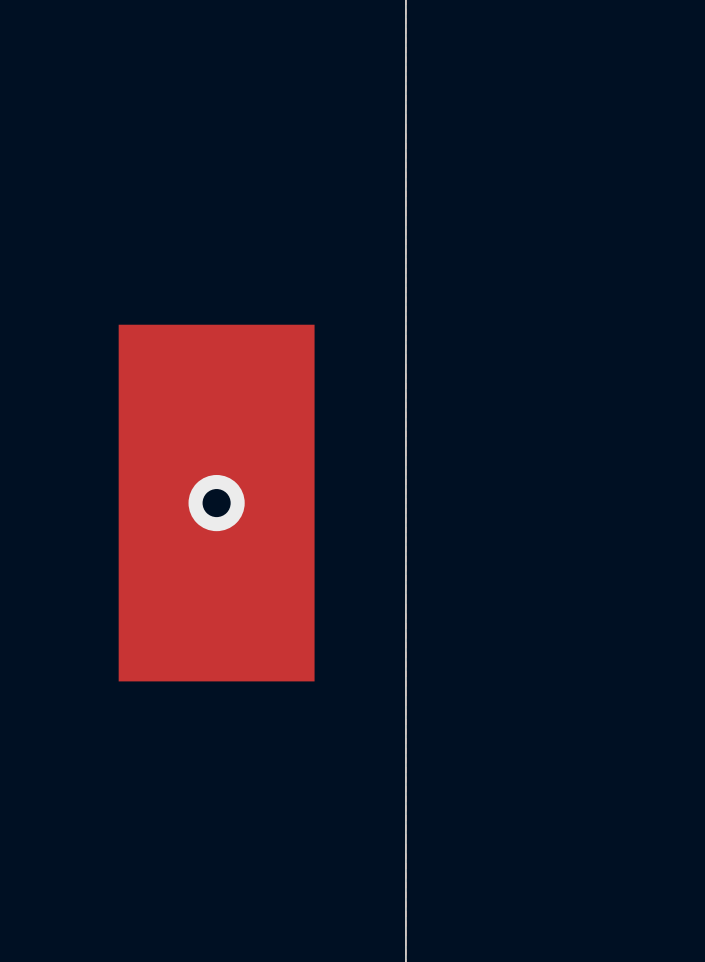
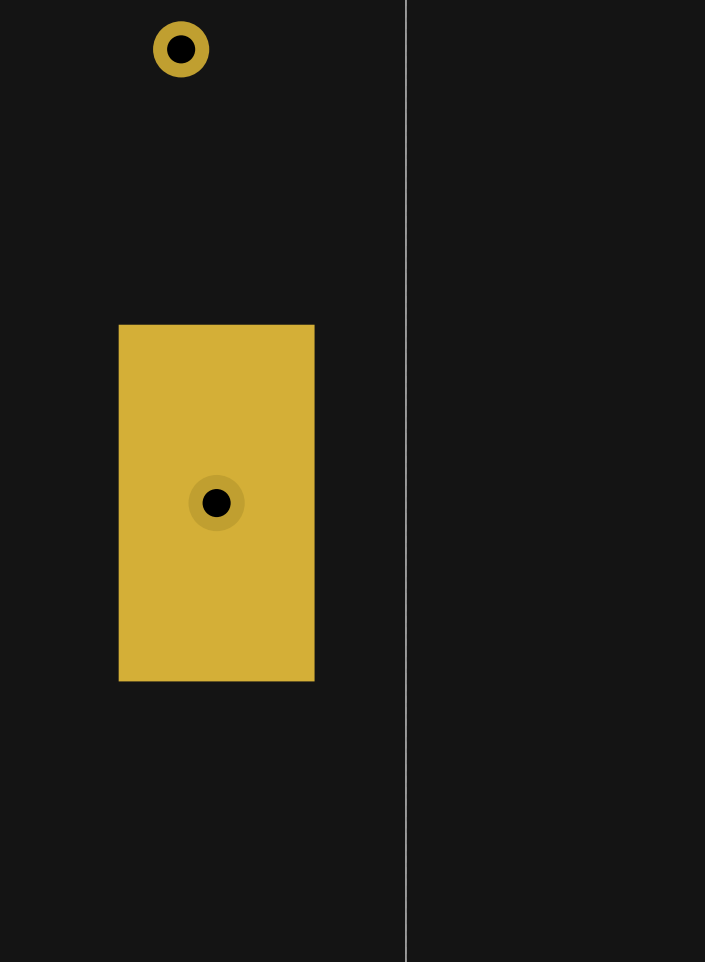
via: none -> (181, 49)

